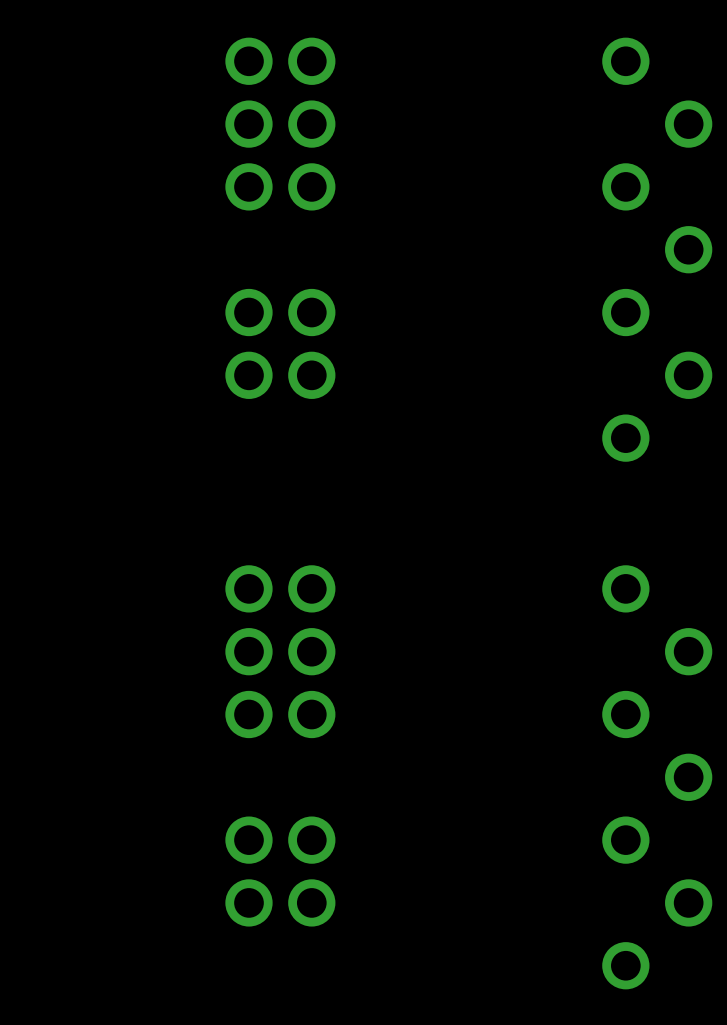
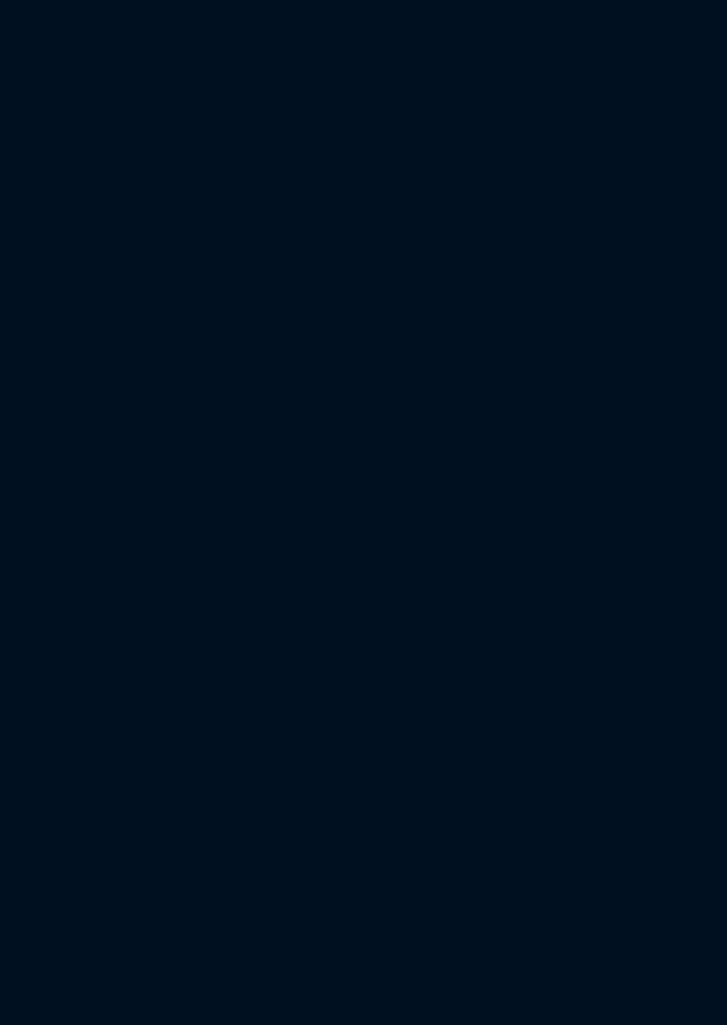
via: (248, 61) -> none
via: (311, 61) -> none
via: (625, 61) -> none
via: (248, 124) -> none
via: (311, 124) -> none
via: (688, 124) -> none
via: (248, 186) -> none
via: (311, 186) -> none
via: (625, 186) -> none
via: (688, 249) -> none
via: (248, 312) -> none
via: (311, 312) -> none
via: (625, 312) -> none
via: (248, 375) -> none
via: (311, 375) -> none
via: (688, 375) -> none
via: (625, 438) -> none
via: (248, 588) -> none
via: (311, 588) -> none
via: (625, 588) -> none
via: (248, 651) -> none
via: (311, 651) -> none
via: (688, 651) -> none
via: (248, 714) -> none
via: (311, 714) -> none
via: (625, 714) -> none
via: (688, 777) -> none
via: (248, 840) -> none
via: (311, 840) -> none
via: (625, 840) -> none
via: (248, 902) -> none
via: (311, 902) -> none
via: (688, 902) -> none
via: (625, 965) -> none

